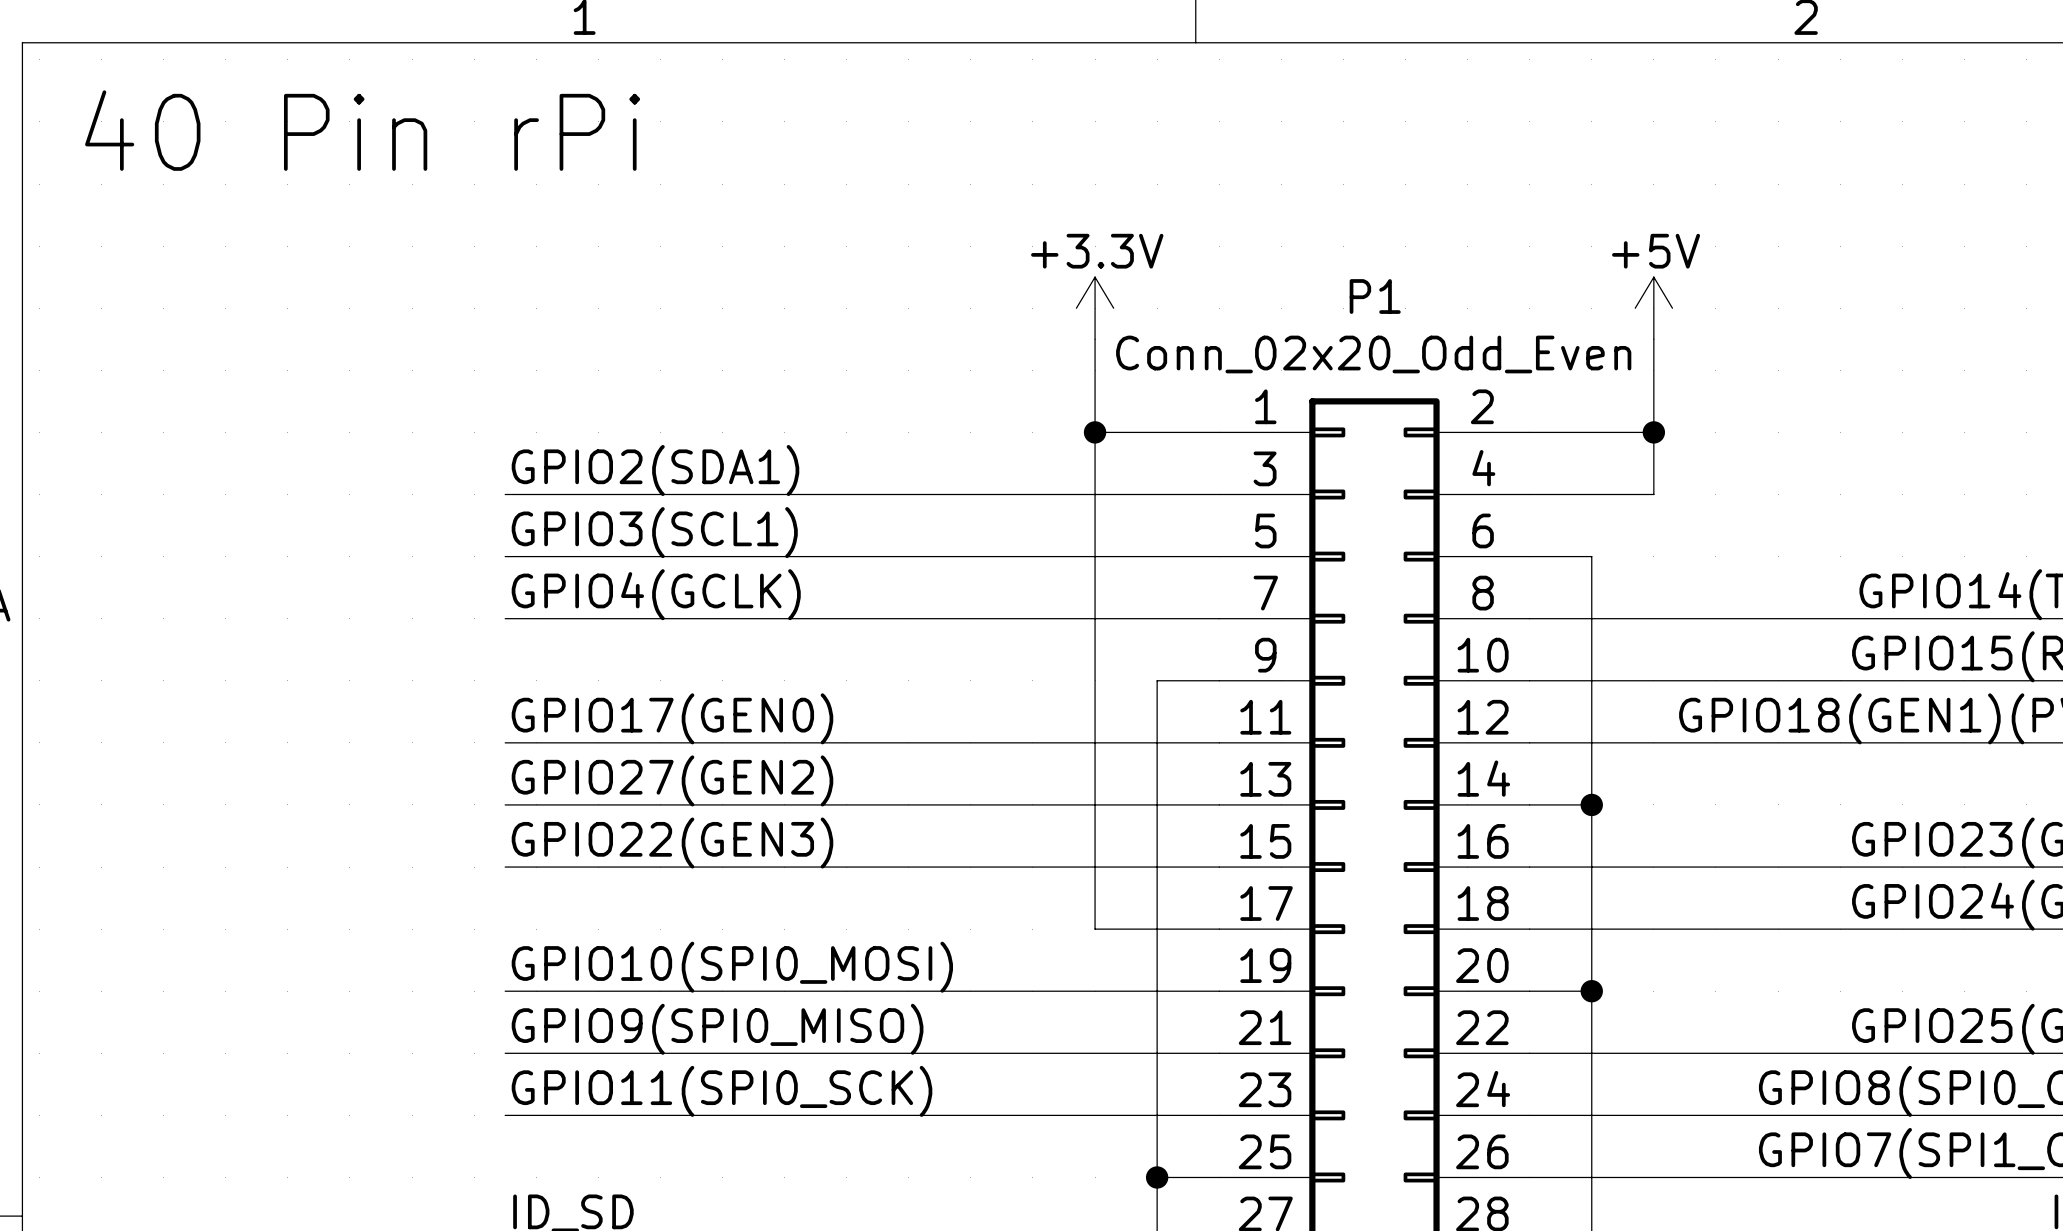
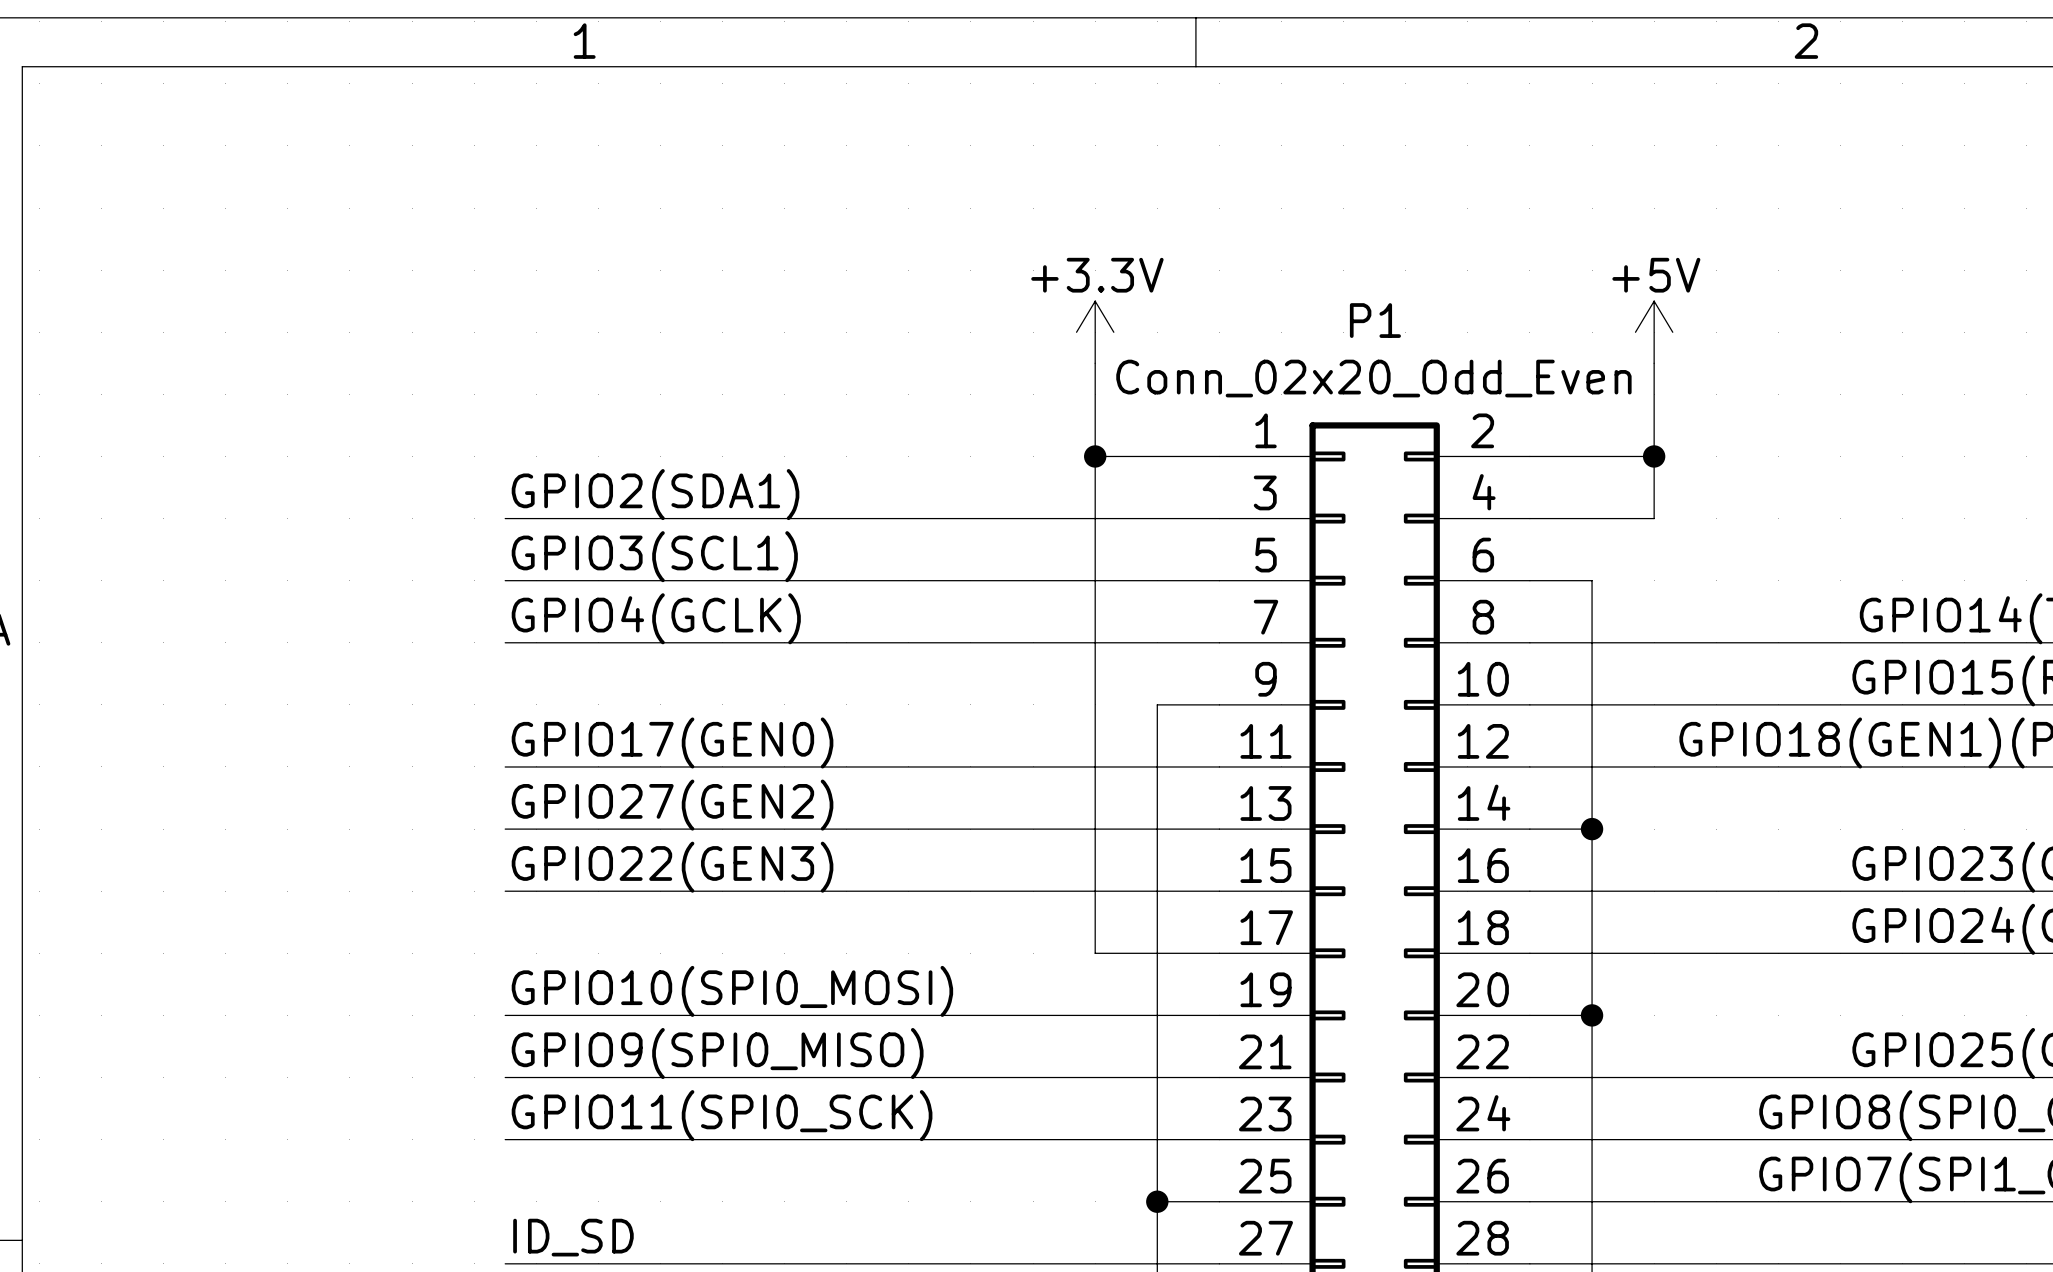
text: 40 Pin rPi (362, 130) -> none

